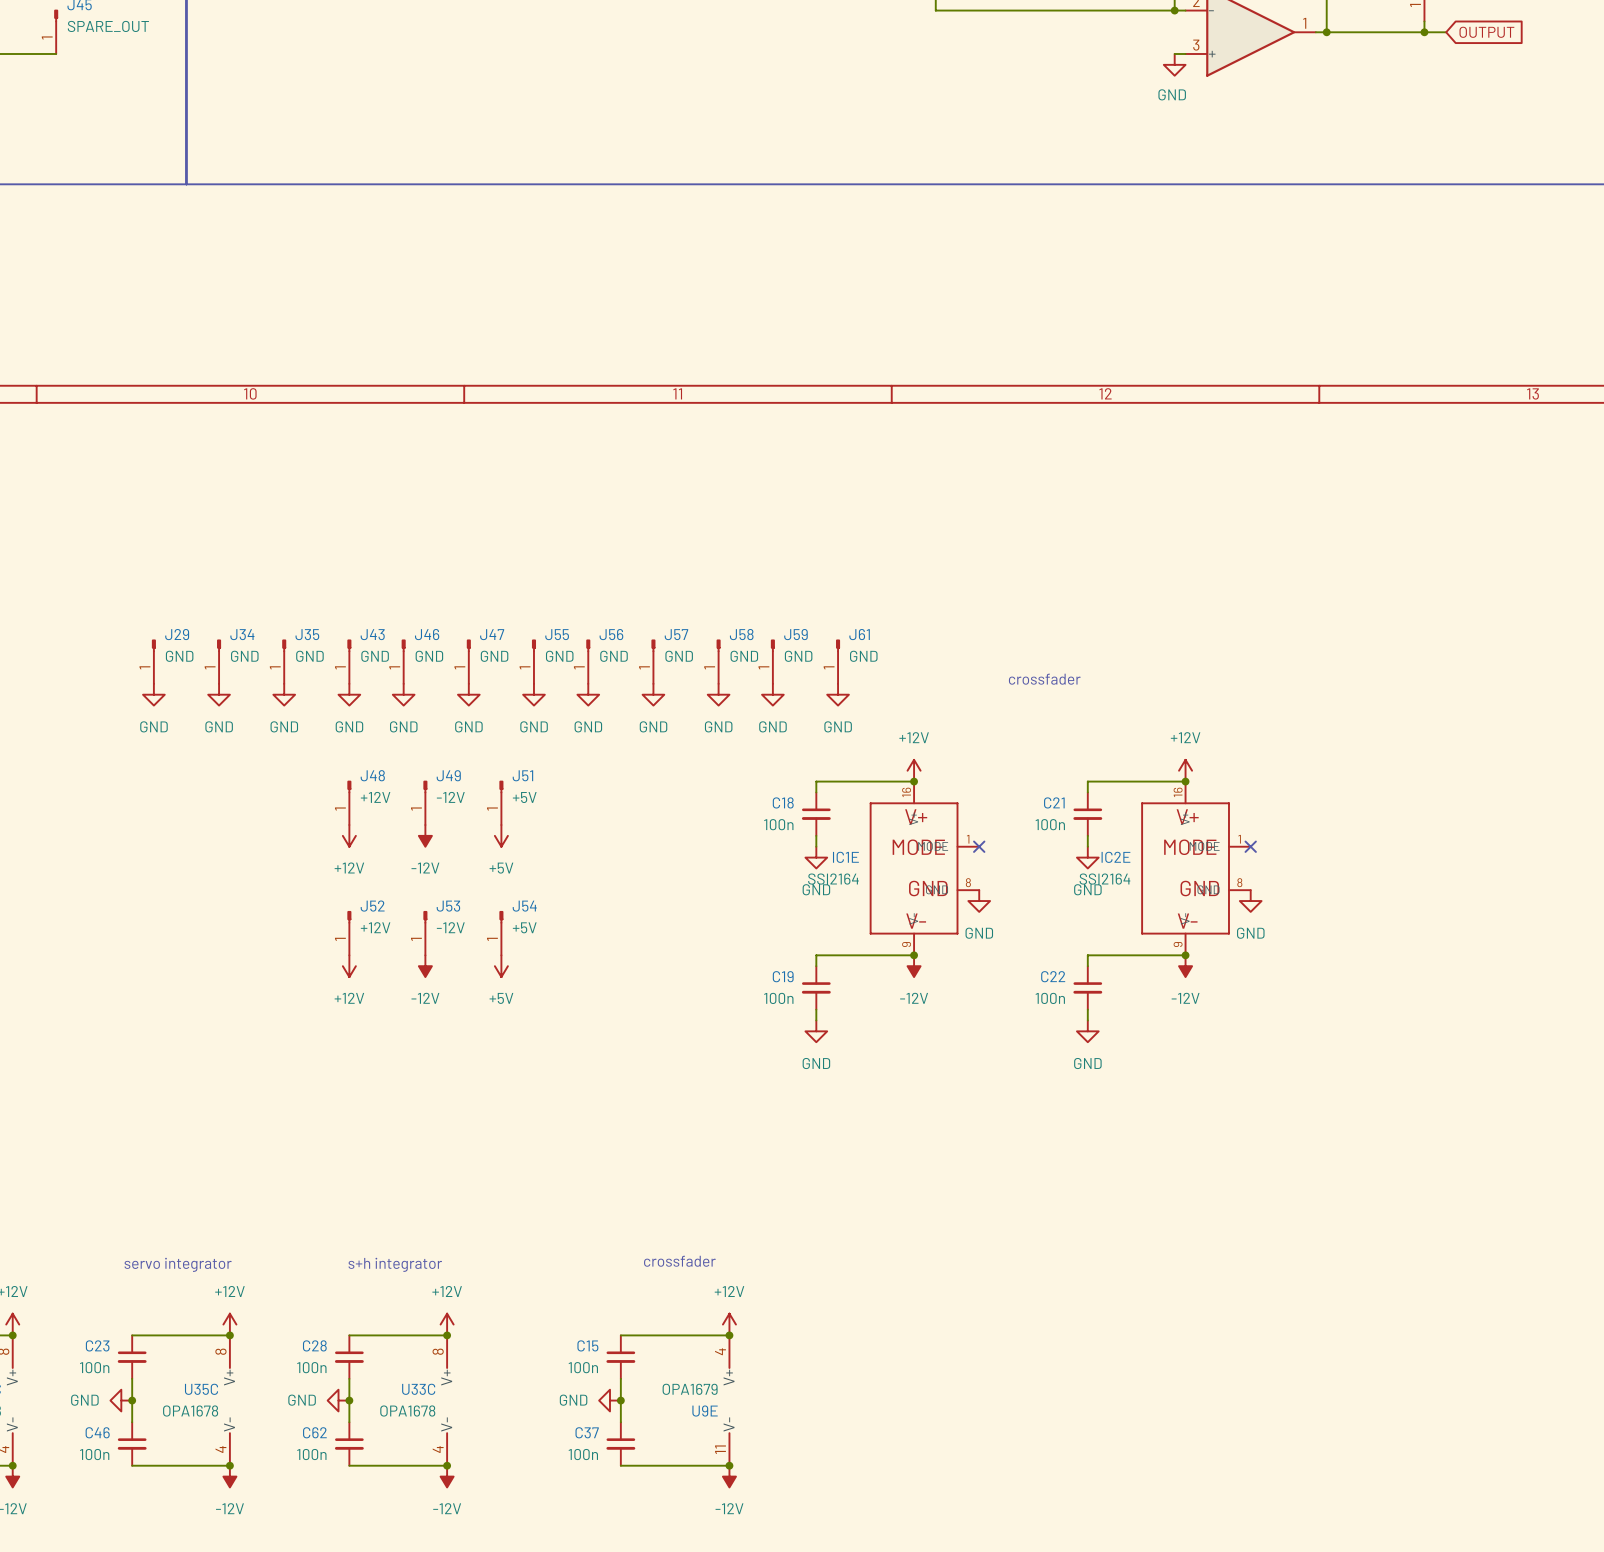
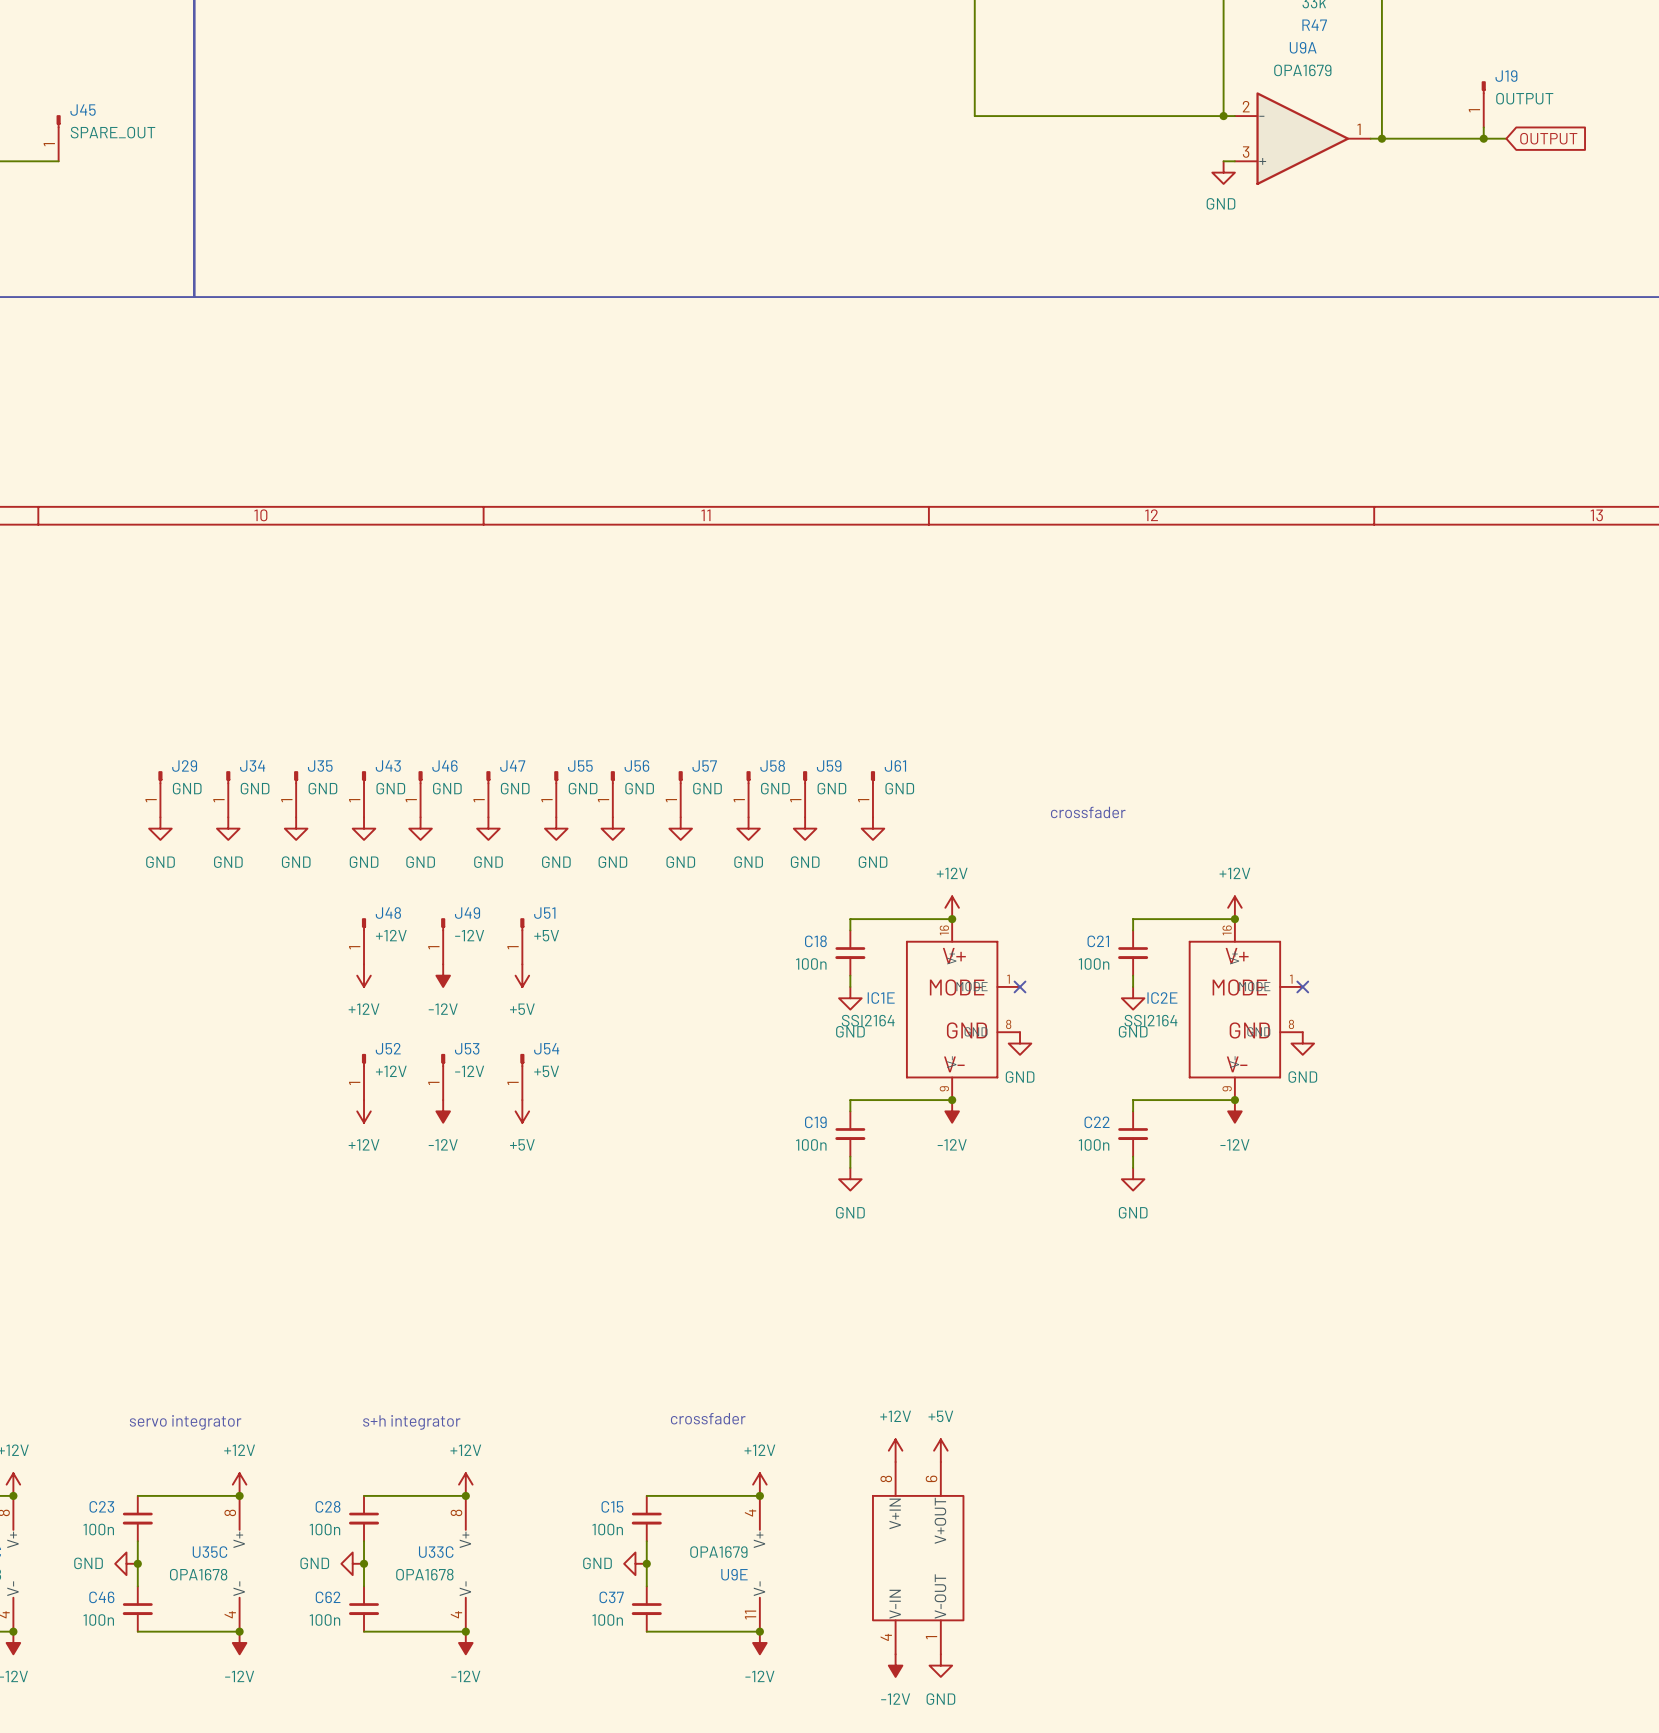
power symbol: none -> +12V (895, 1450)
power symbol: none -> +5V (940, 1450)
part: none -> (918, 1558)
power symbol: none -> -12V (895, 1665)
power symbol: none -> GND (940, 1665)

